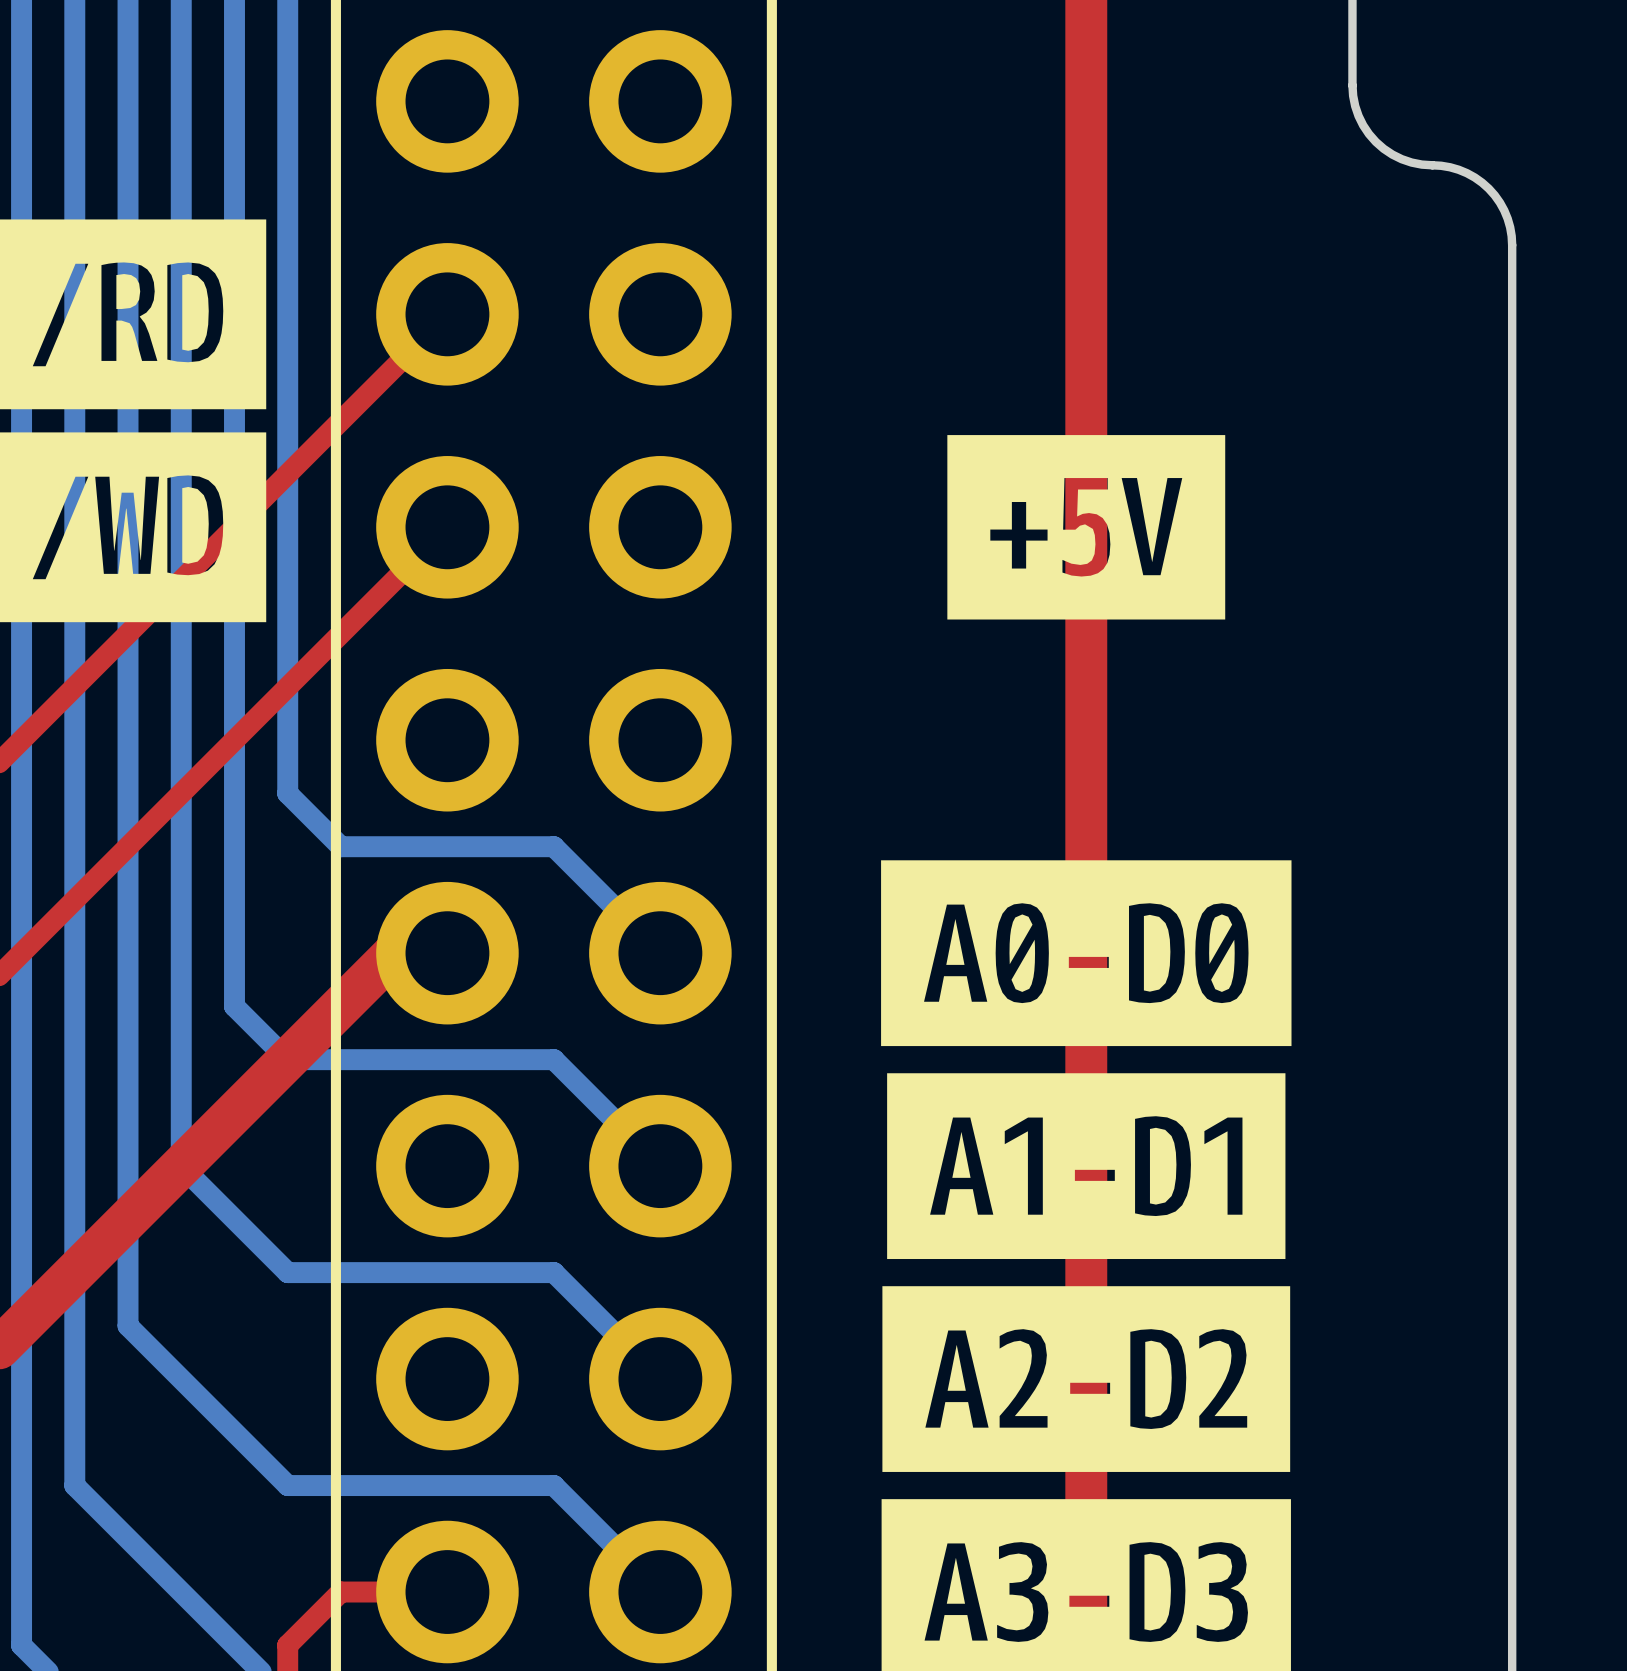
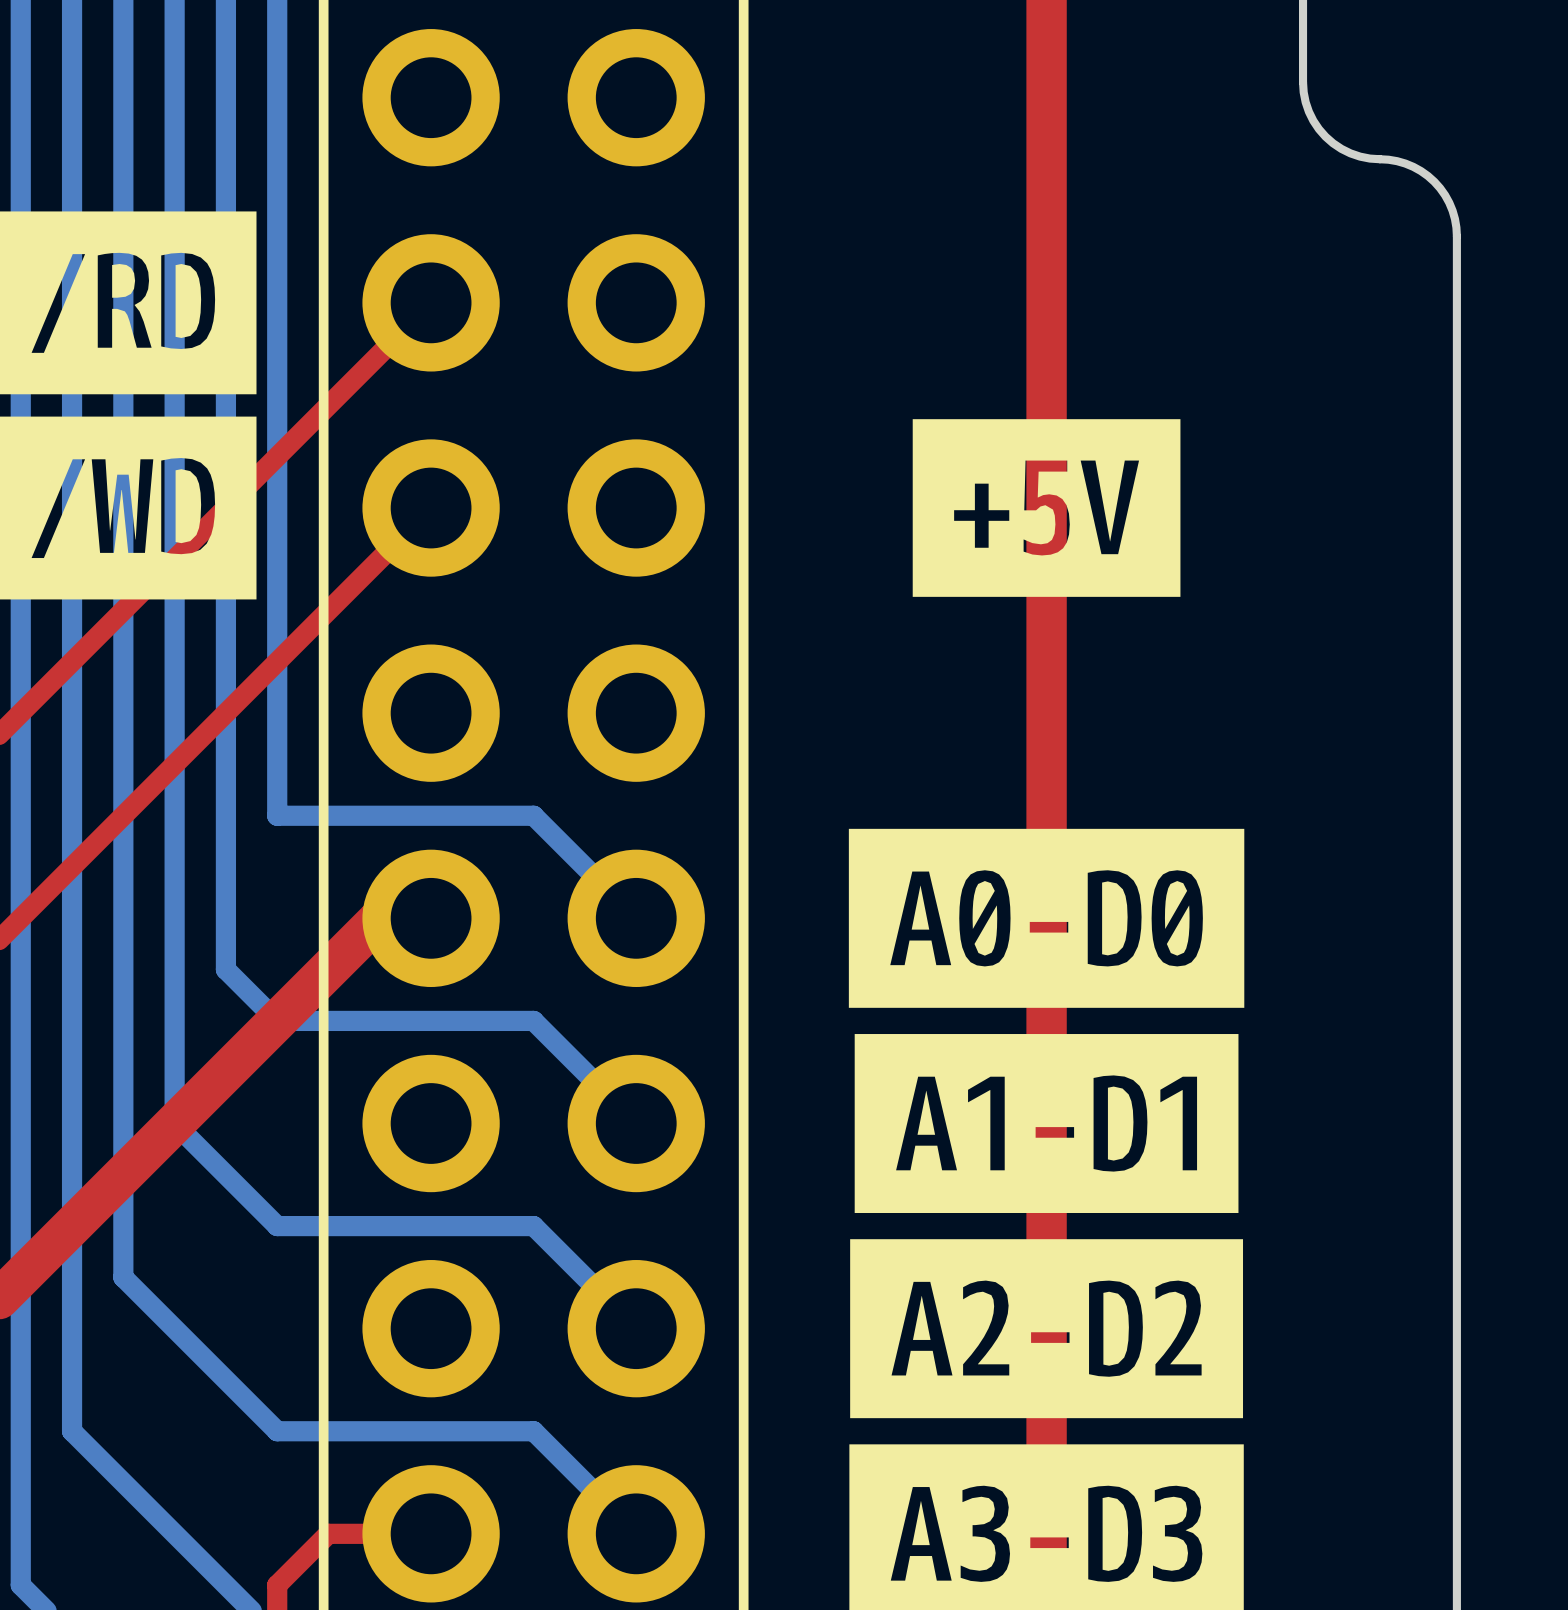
bottom track: (287, 793) (340, 846) -> (277, 764) (277, 815) (328, 815)

